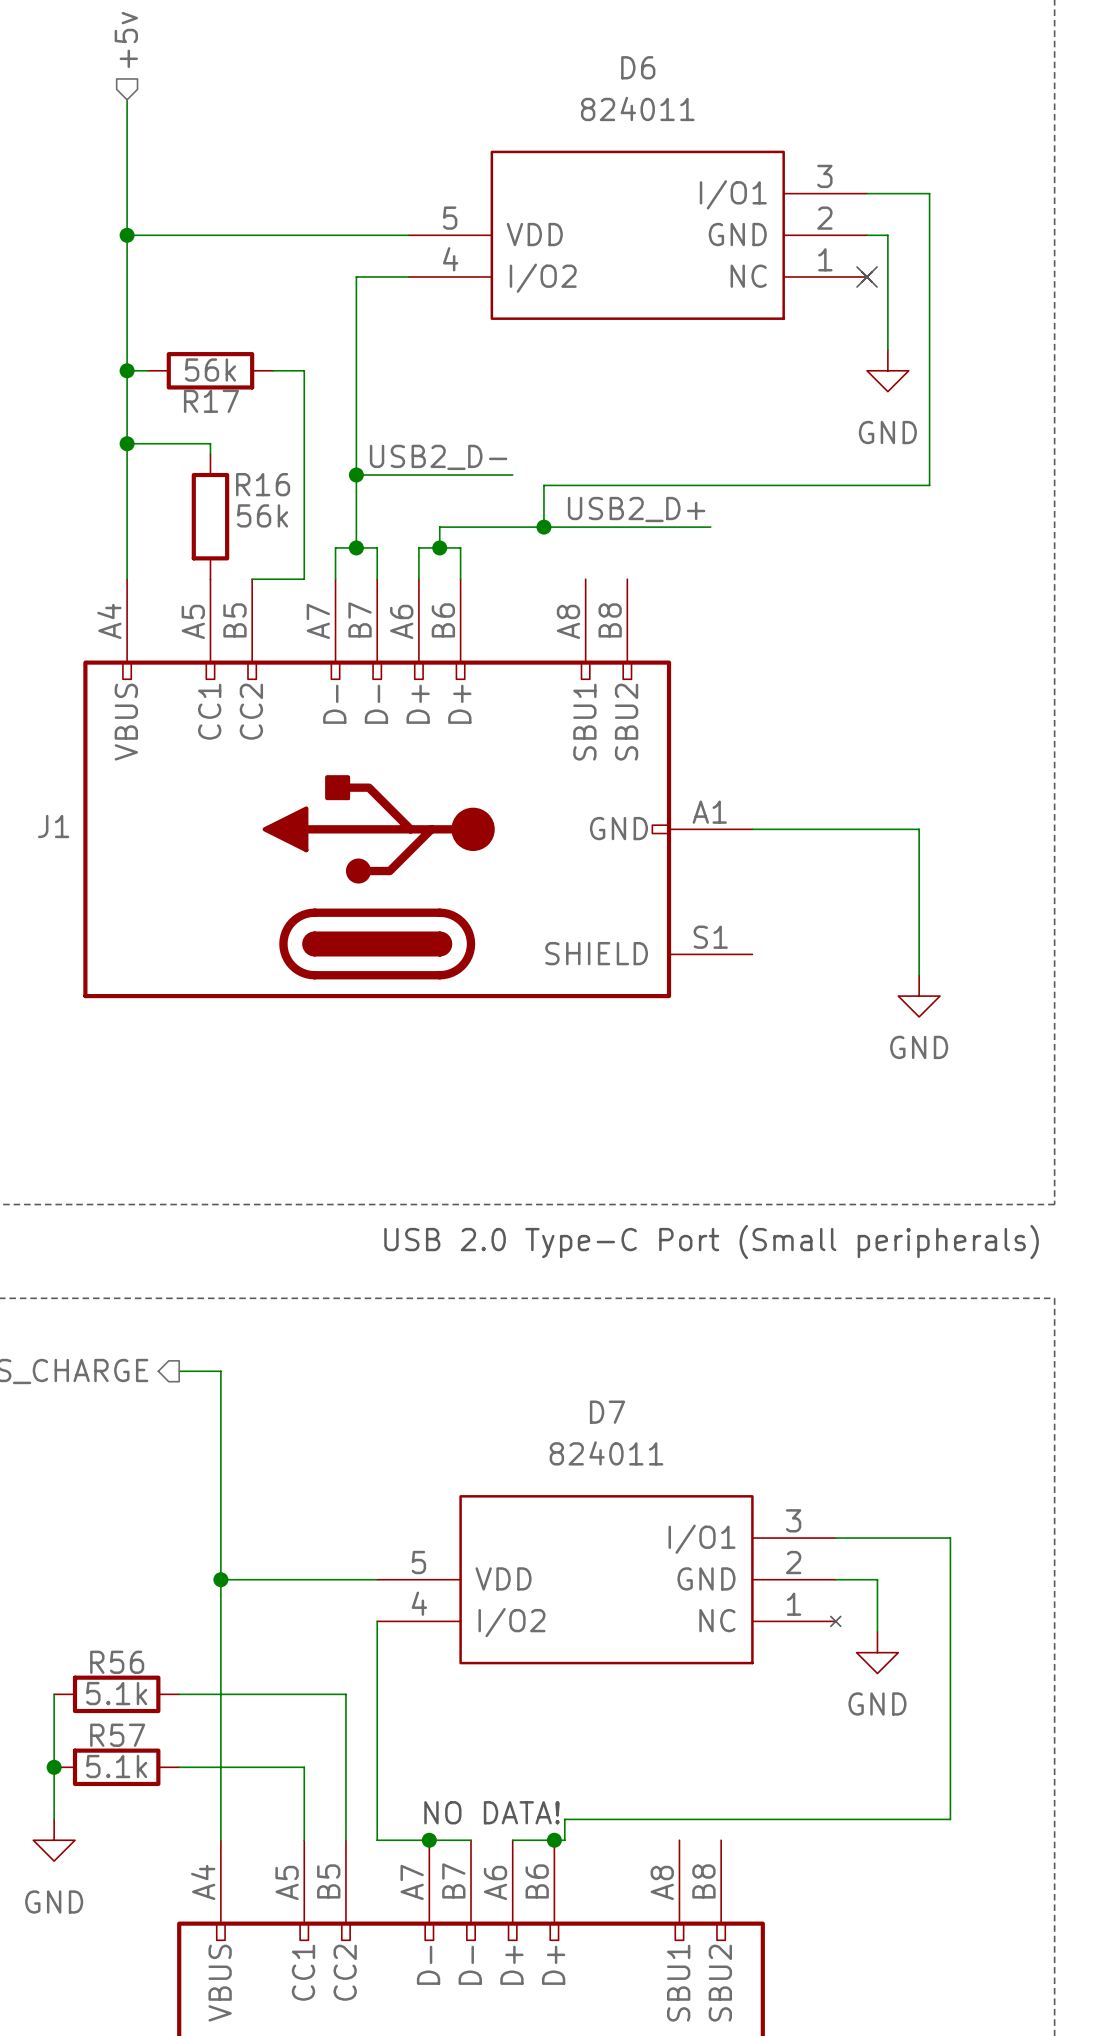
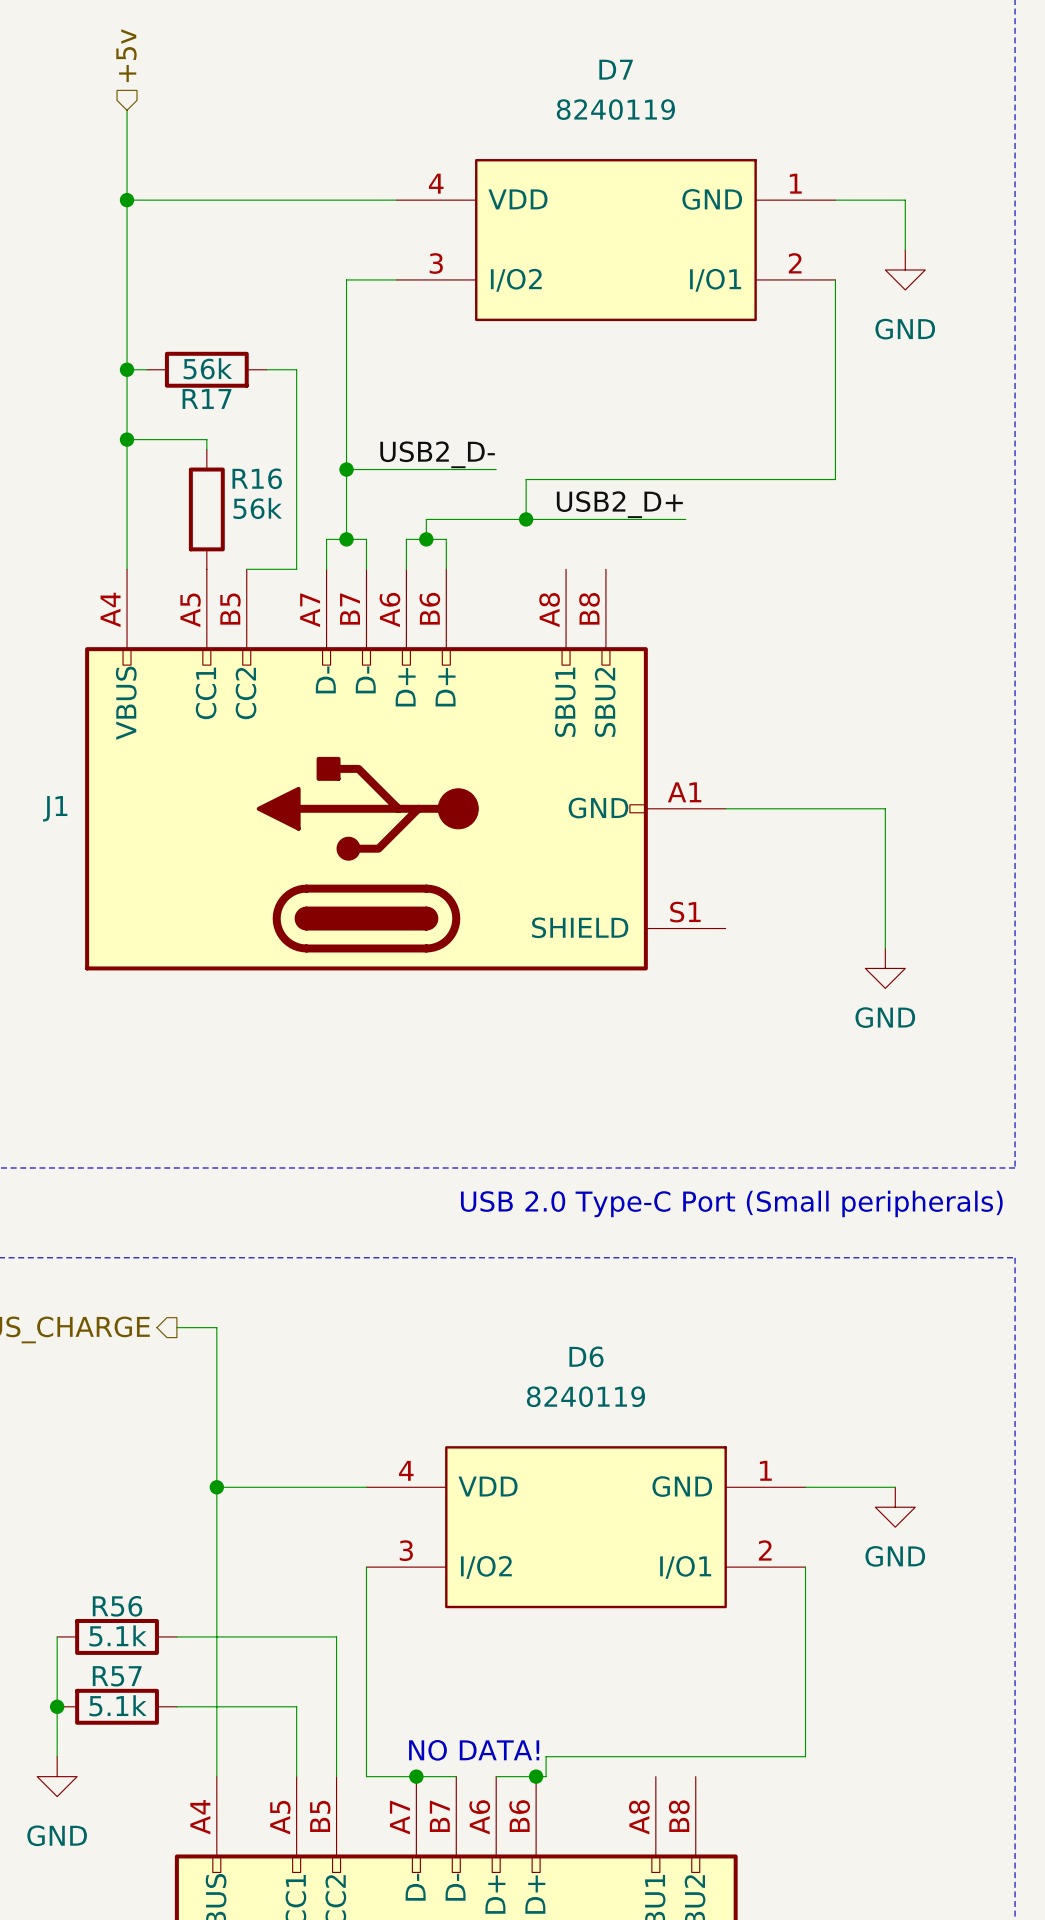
D6 value: 824011 (637, 108) -> 8240119 (585, 1396)
D6 symbol: [408, 150, 872, 320] -> [366, 1446, 806, 1609]
wire: (929, 193) (929, 485) (867, 485) -> (835, 279) (835, 479)
wire: none -> (895, 200) (905, 200) (905, 250)
wire: (127, 235) (408, 235) -> (127, 200) (396, 200)
junction position: (127, 235) -> (127, 200)
wire: (867, 235) (887, 235) (887, 349) -> none
no-connect mark: (867, 276) -> none
power symbol position: GND (887, 370) -> GND (905, 269)
D7 value: 824011 (606, 1453) -> 8240119 (615, 109)
D7 symbol: [377, 1495, 841, 1665] -> [396, 159, 836, 322]
wire: (929, 1538) (950, 1538) (950, 1819) (835, 1819) -> (805, 1567) (805, 1756)
wire: (220, 1579) (377, 1579) -> (216, 1487) (366, 1487)
junction position: (220, 1579) -> (216, 1487)
wire: (835, 1579) (877, 1579) (877, 1631) -> none
power symbol position: GND (877, 1652) -> GND (895, 1507)

